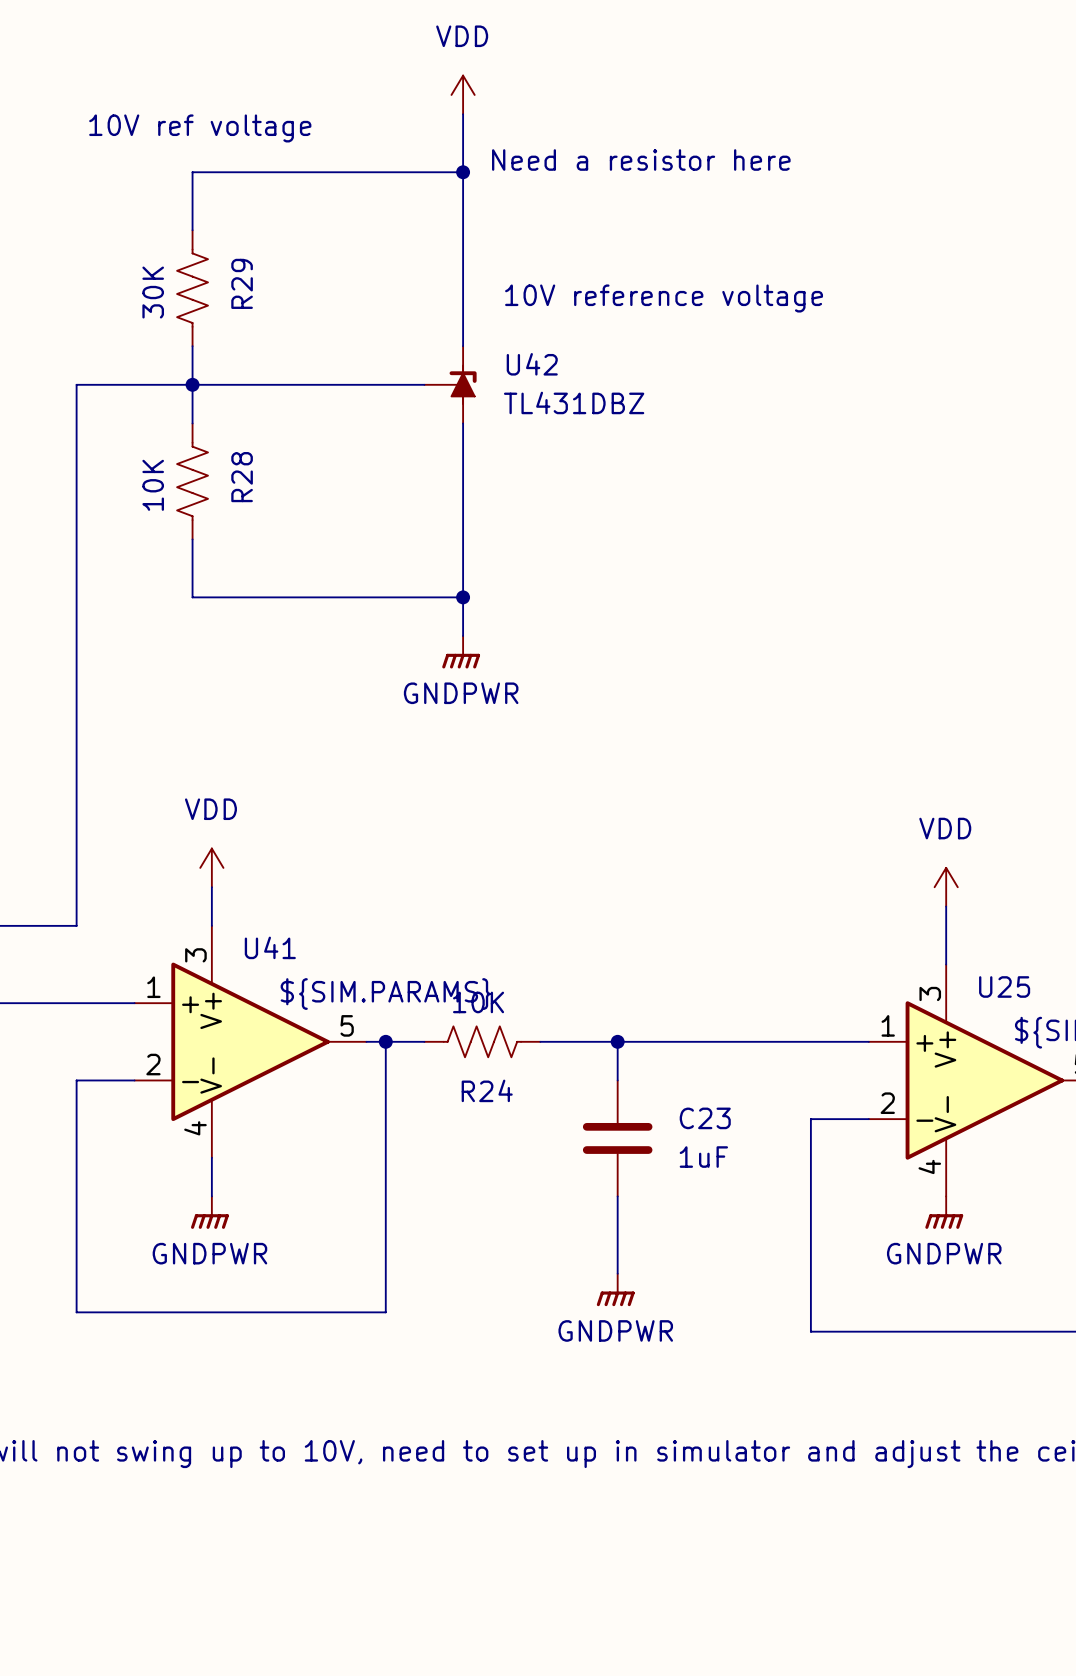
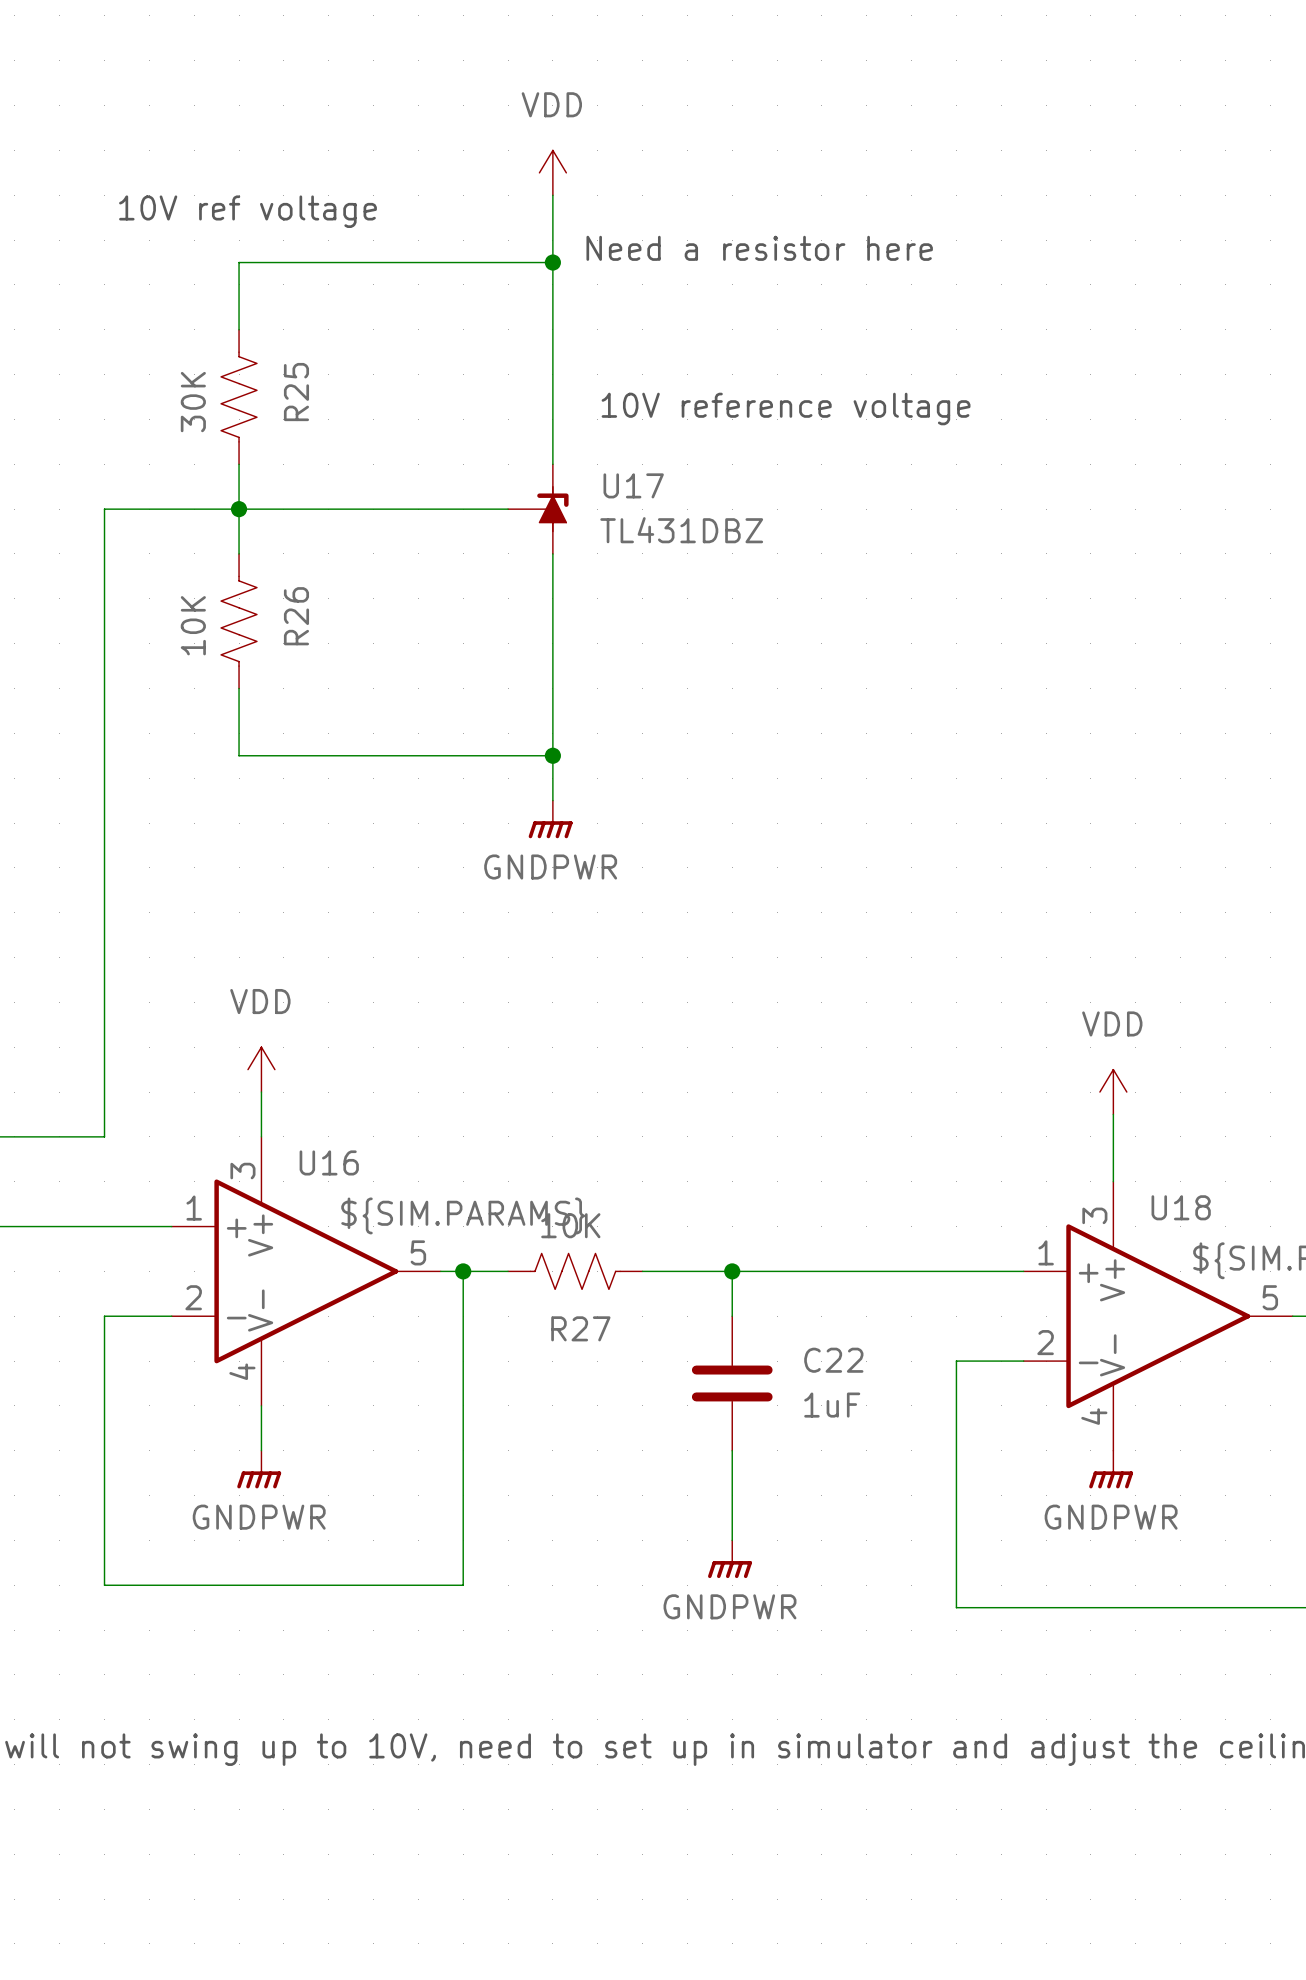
R29 name: R29 (242, 283) -> R25 (296, 392)
U42 name: U42 (532, 364) -> U17 (633, 485)
R28 name: R28 (242, 477) -> R26 (296, 616)
U41 name: U41 (270, 947) -> U16 (329, 1162)
U25 name: U25 (1004, 986) -> U18 (1181, 1207)
R24 name: R24 (487, 1090) -> R27 (580, 1328)
C23 name: C23 (705, 1118) -> C22 (833, 1360)

